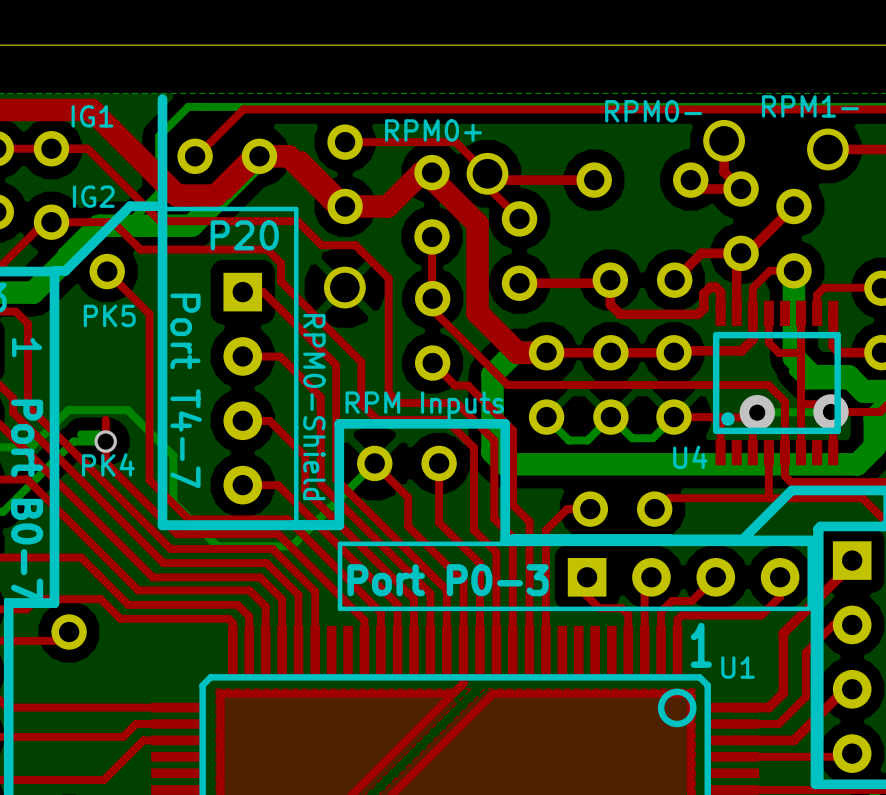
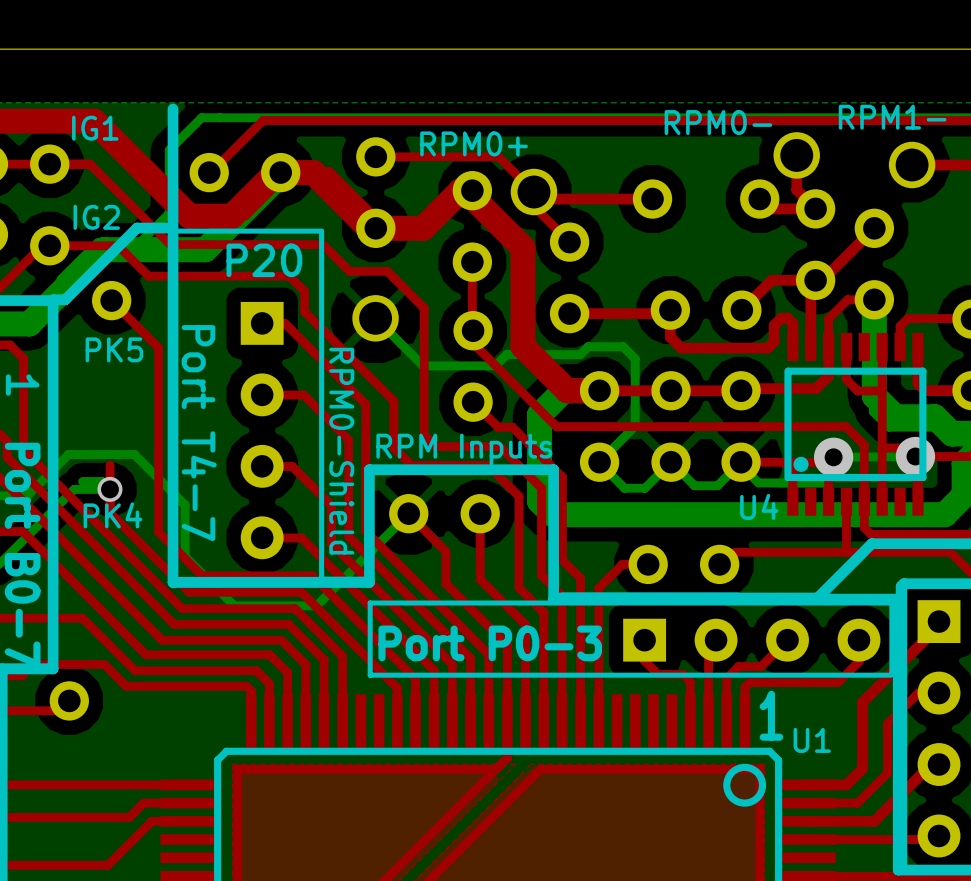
bottom track: none -> (375, 318) (423, 365) (495, 365) (506, 354) (580, 354) (588, 346) (623, 346) (635, 358) (635, 426) (599, 461)
bottom track: none -> (833, 457) (833, 474) (825, 482) (758, 482) (741, 465) (741, 462)

